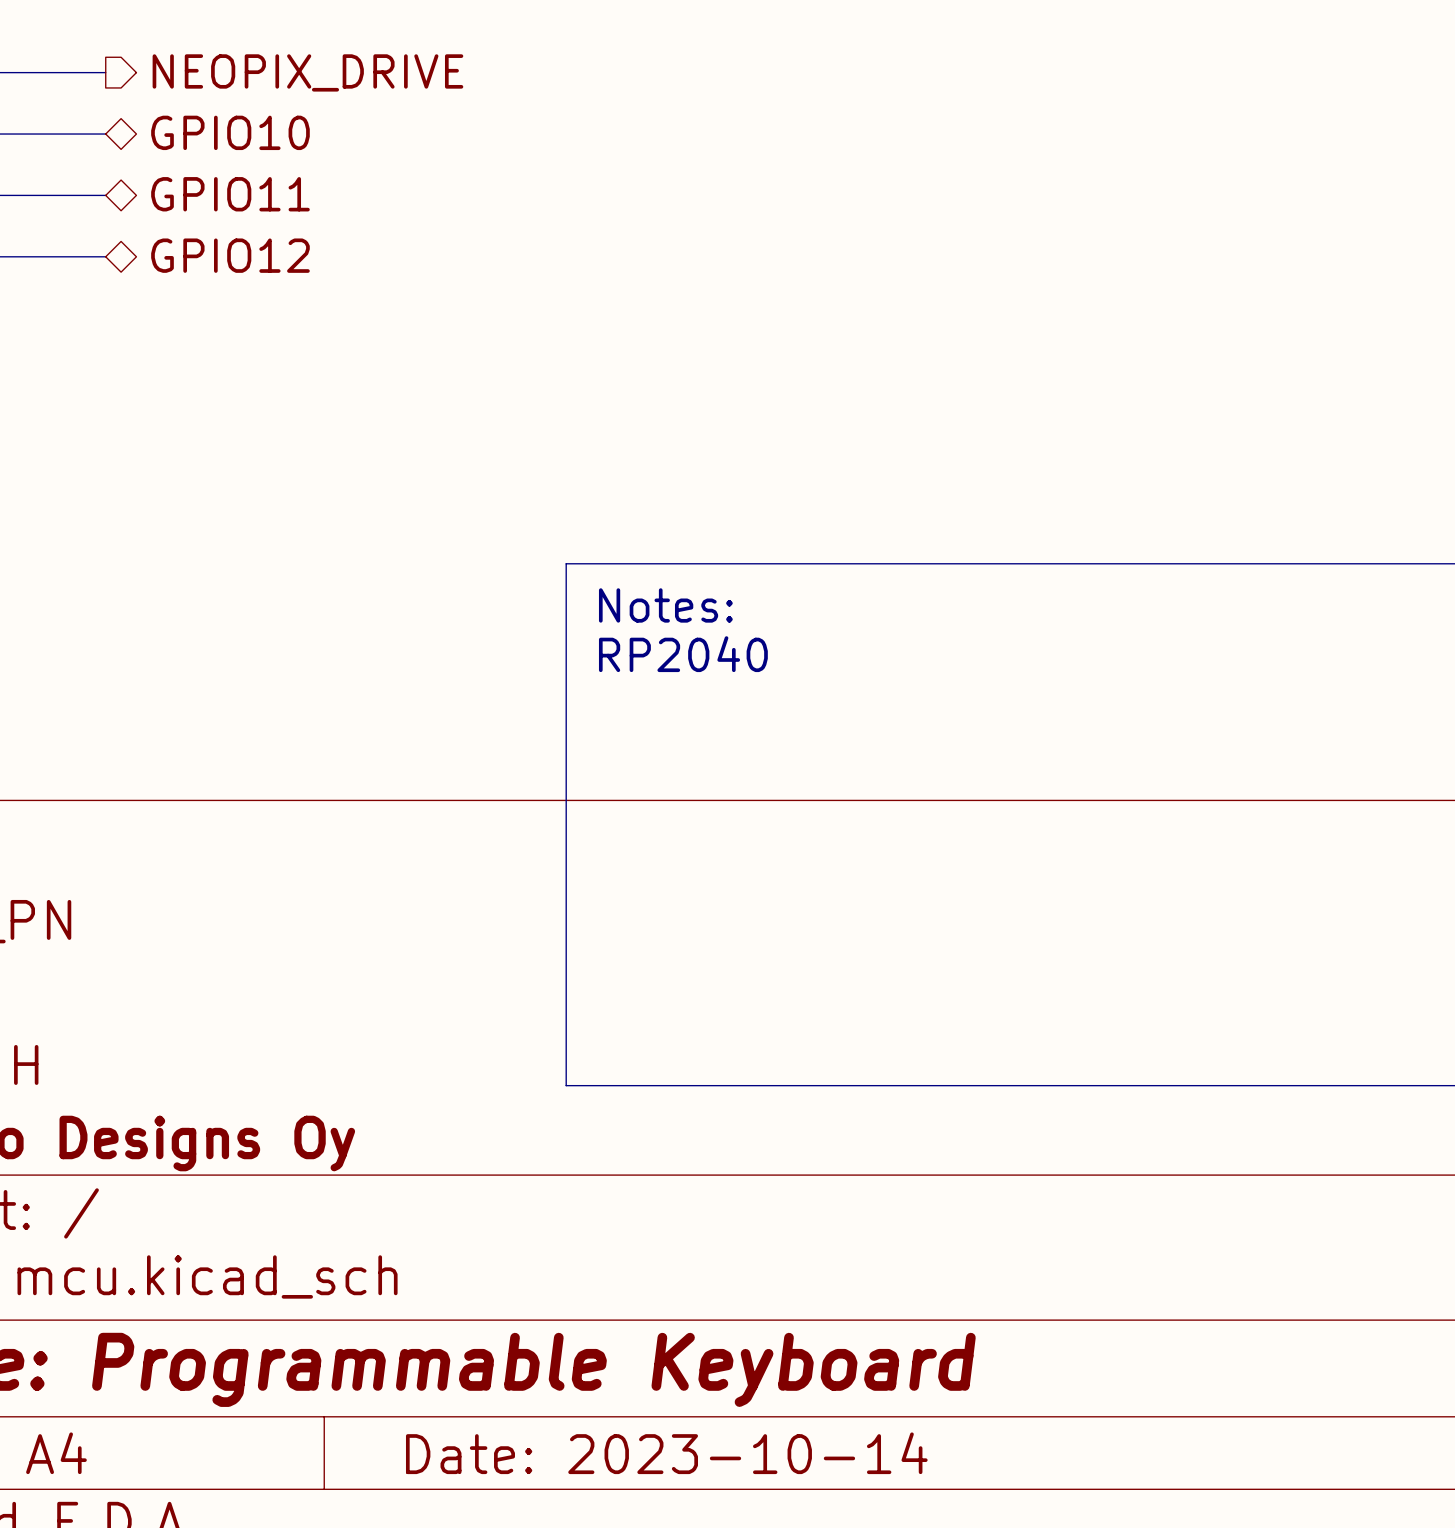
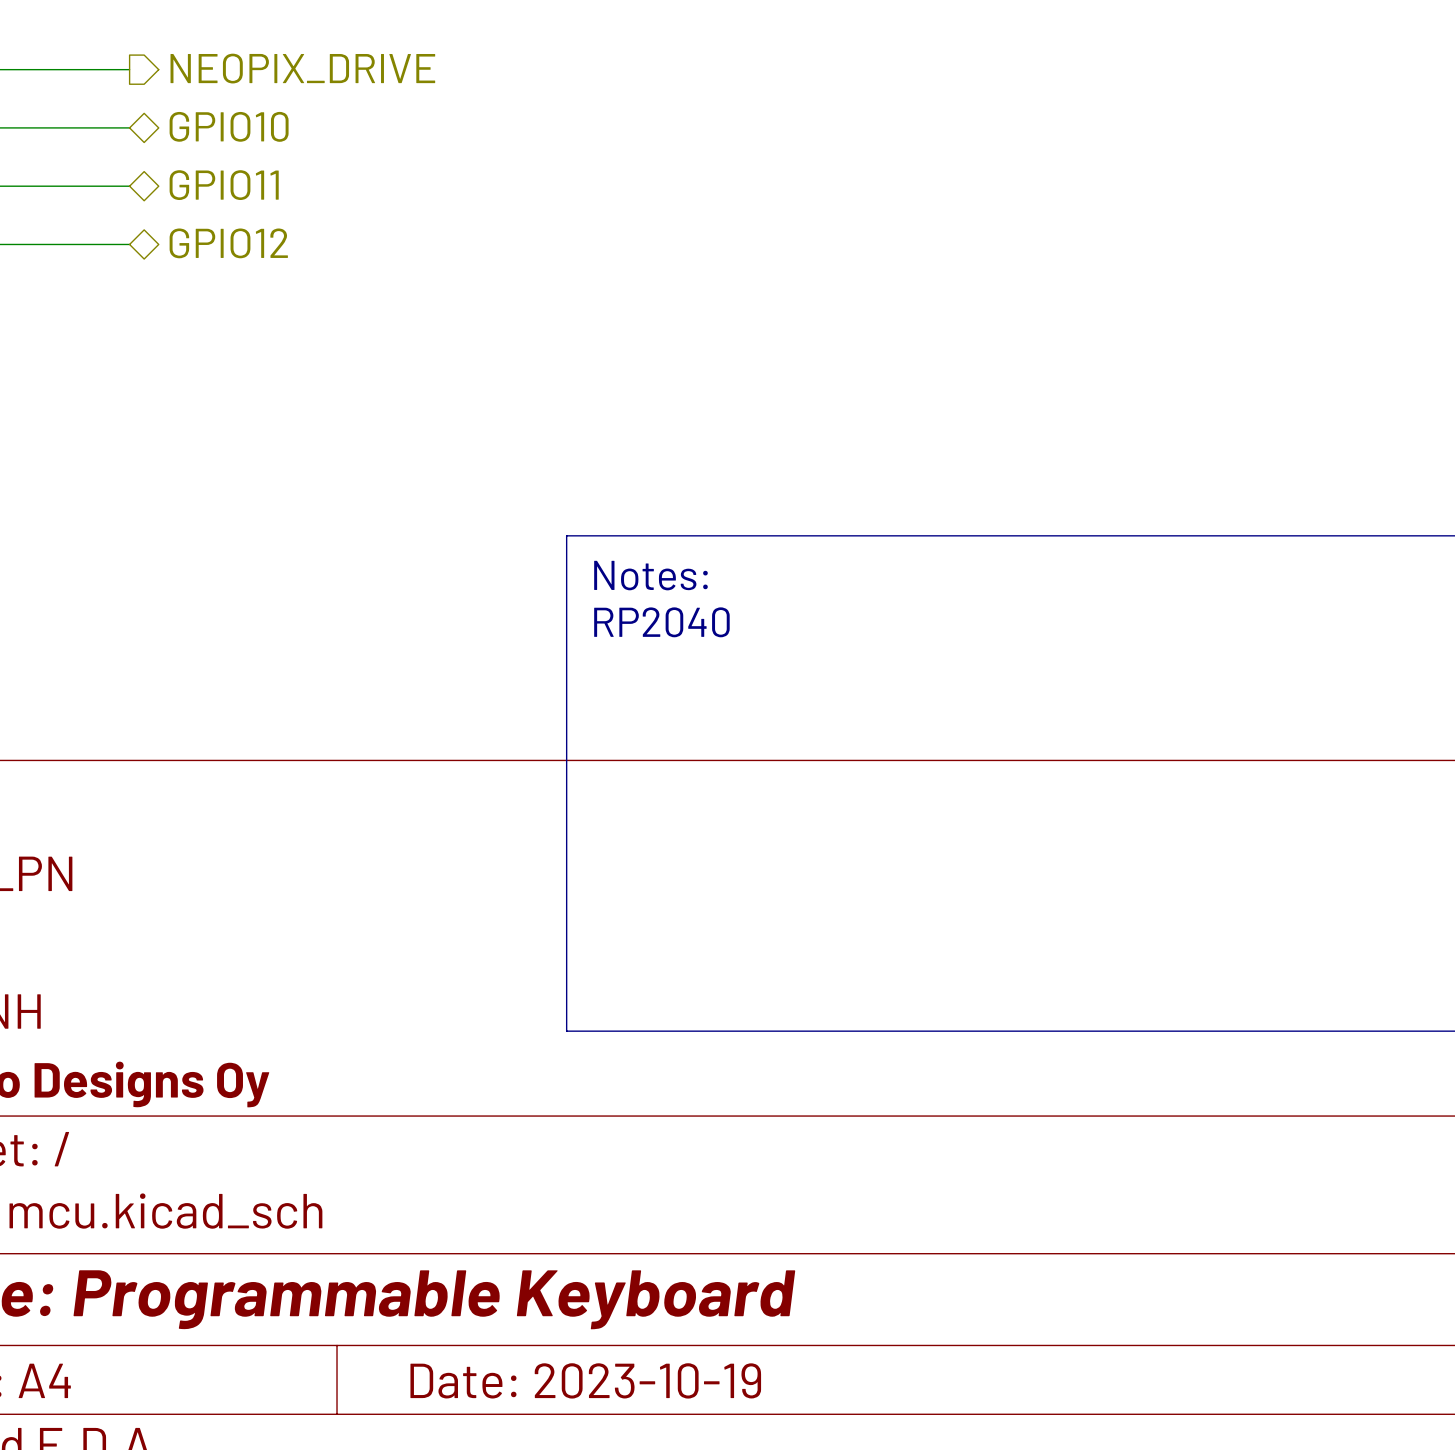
title block: Date: 2023-10-14 (666, 1453) -> Date: 2023-10-19 (585, 1380)

